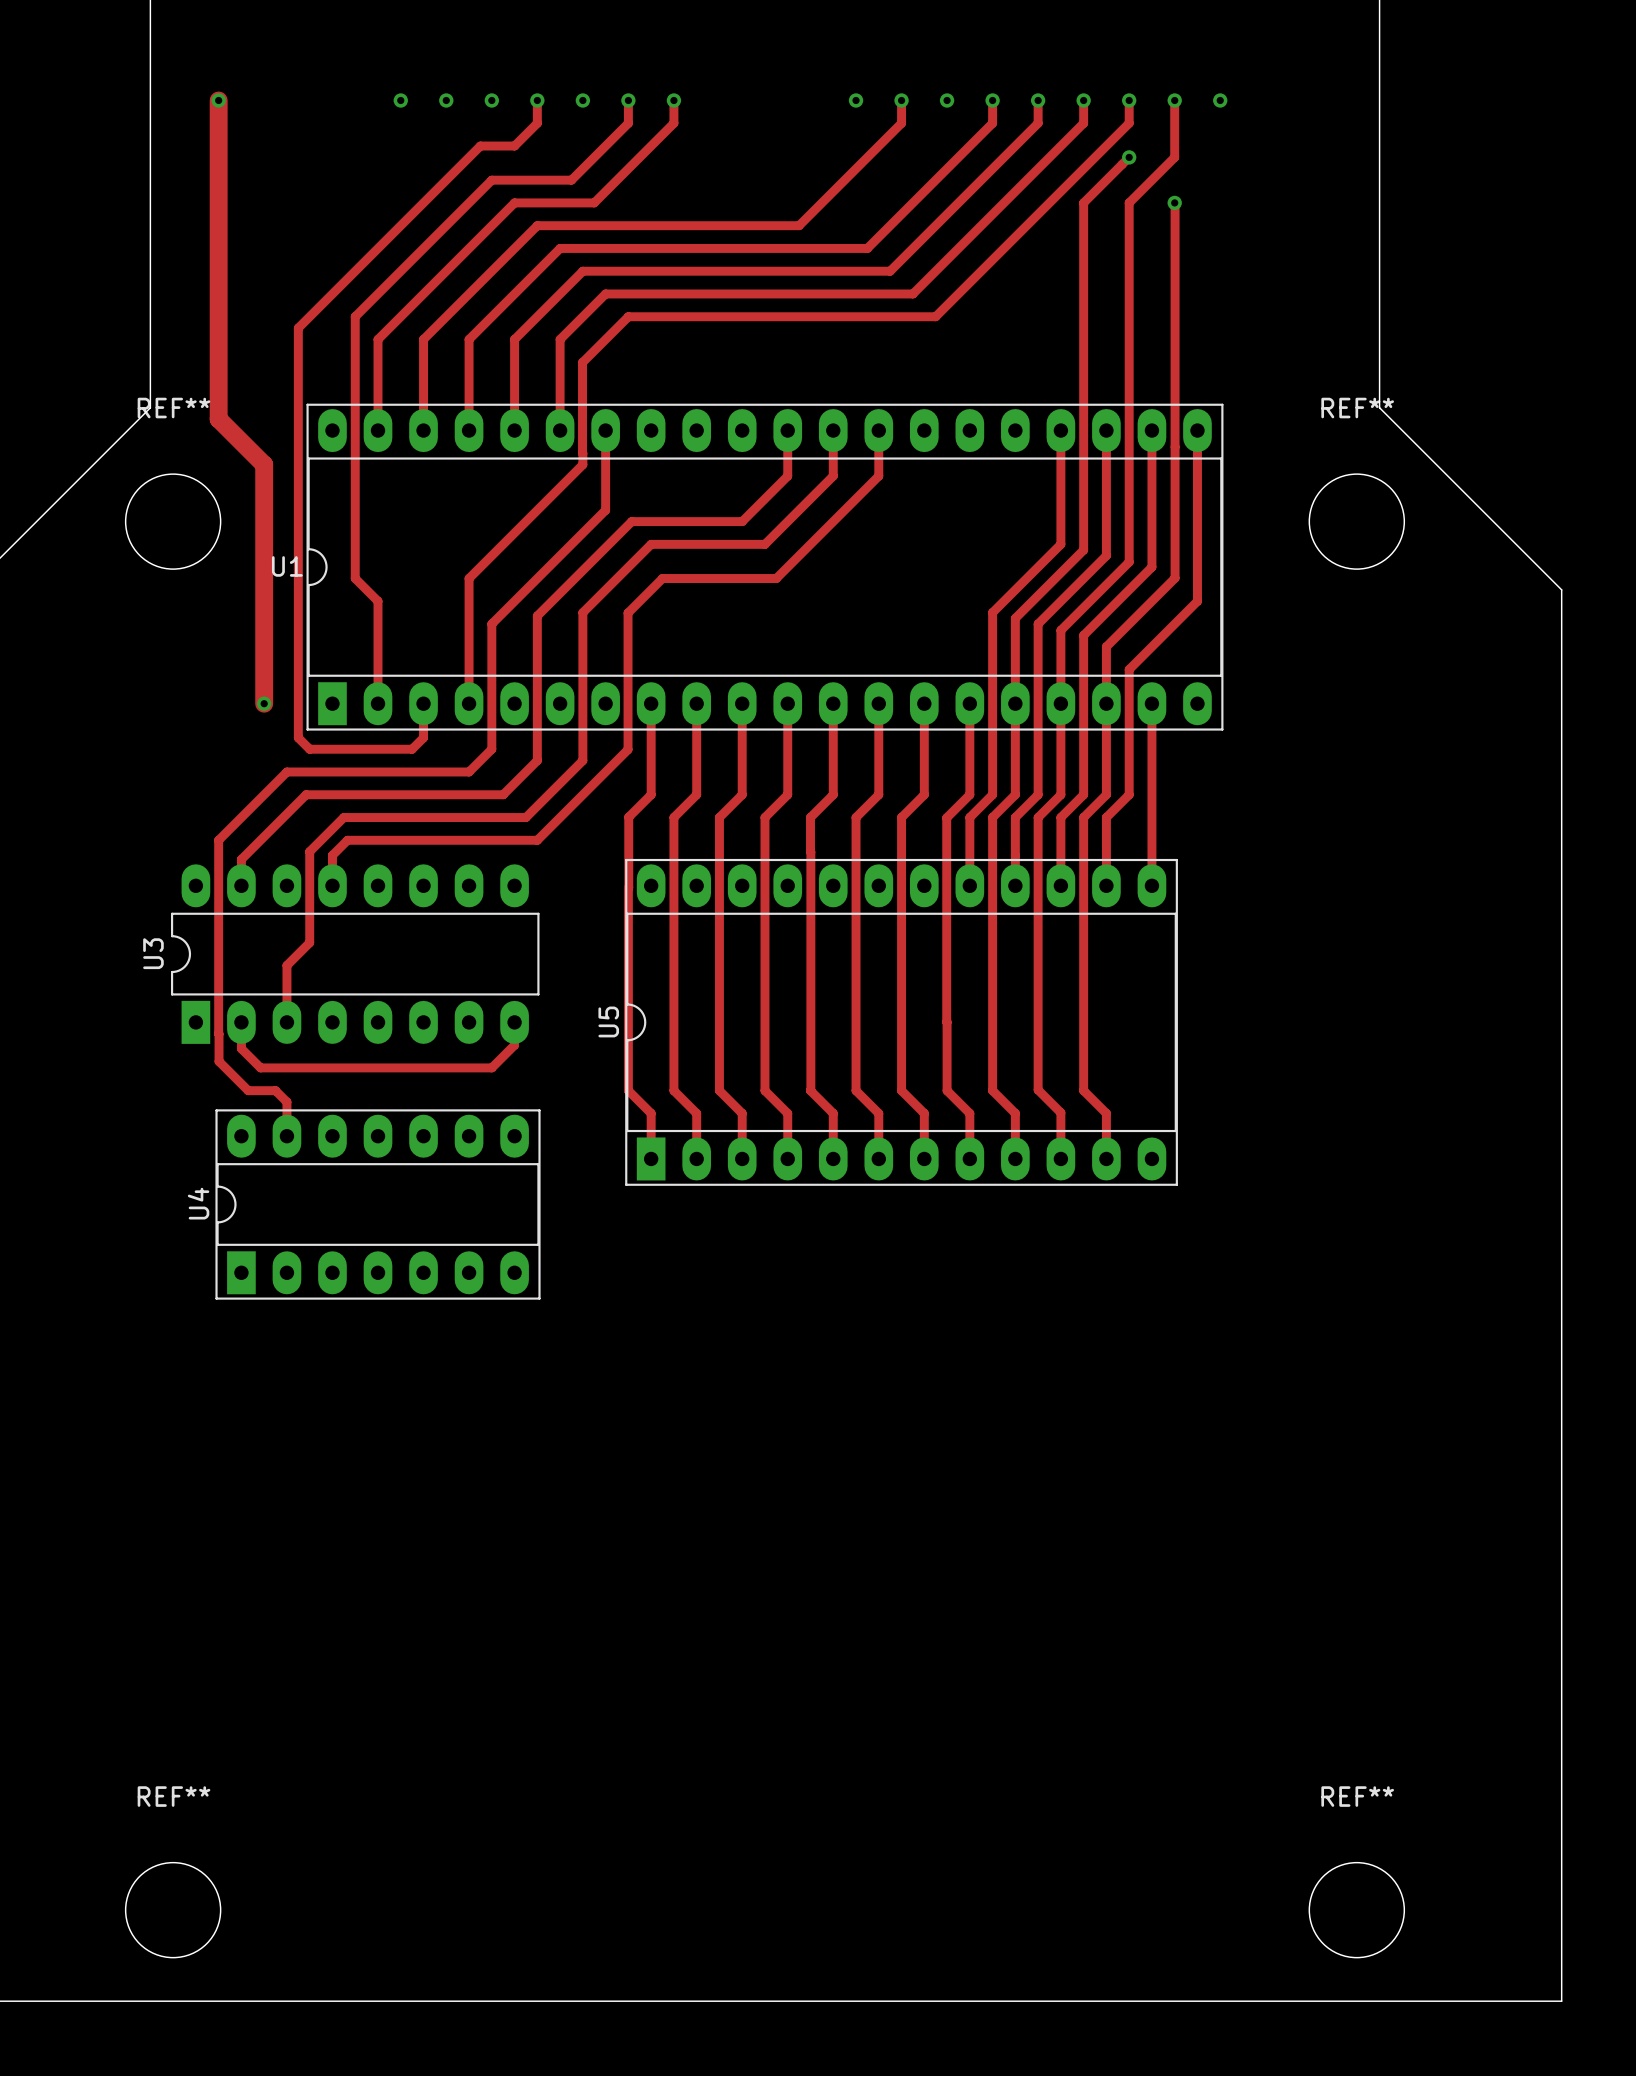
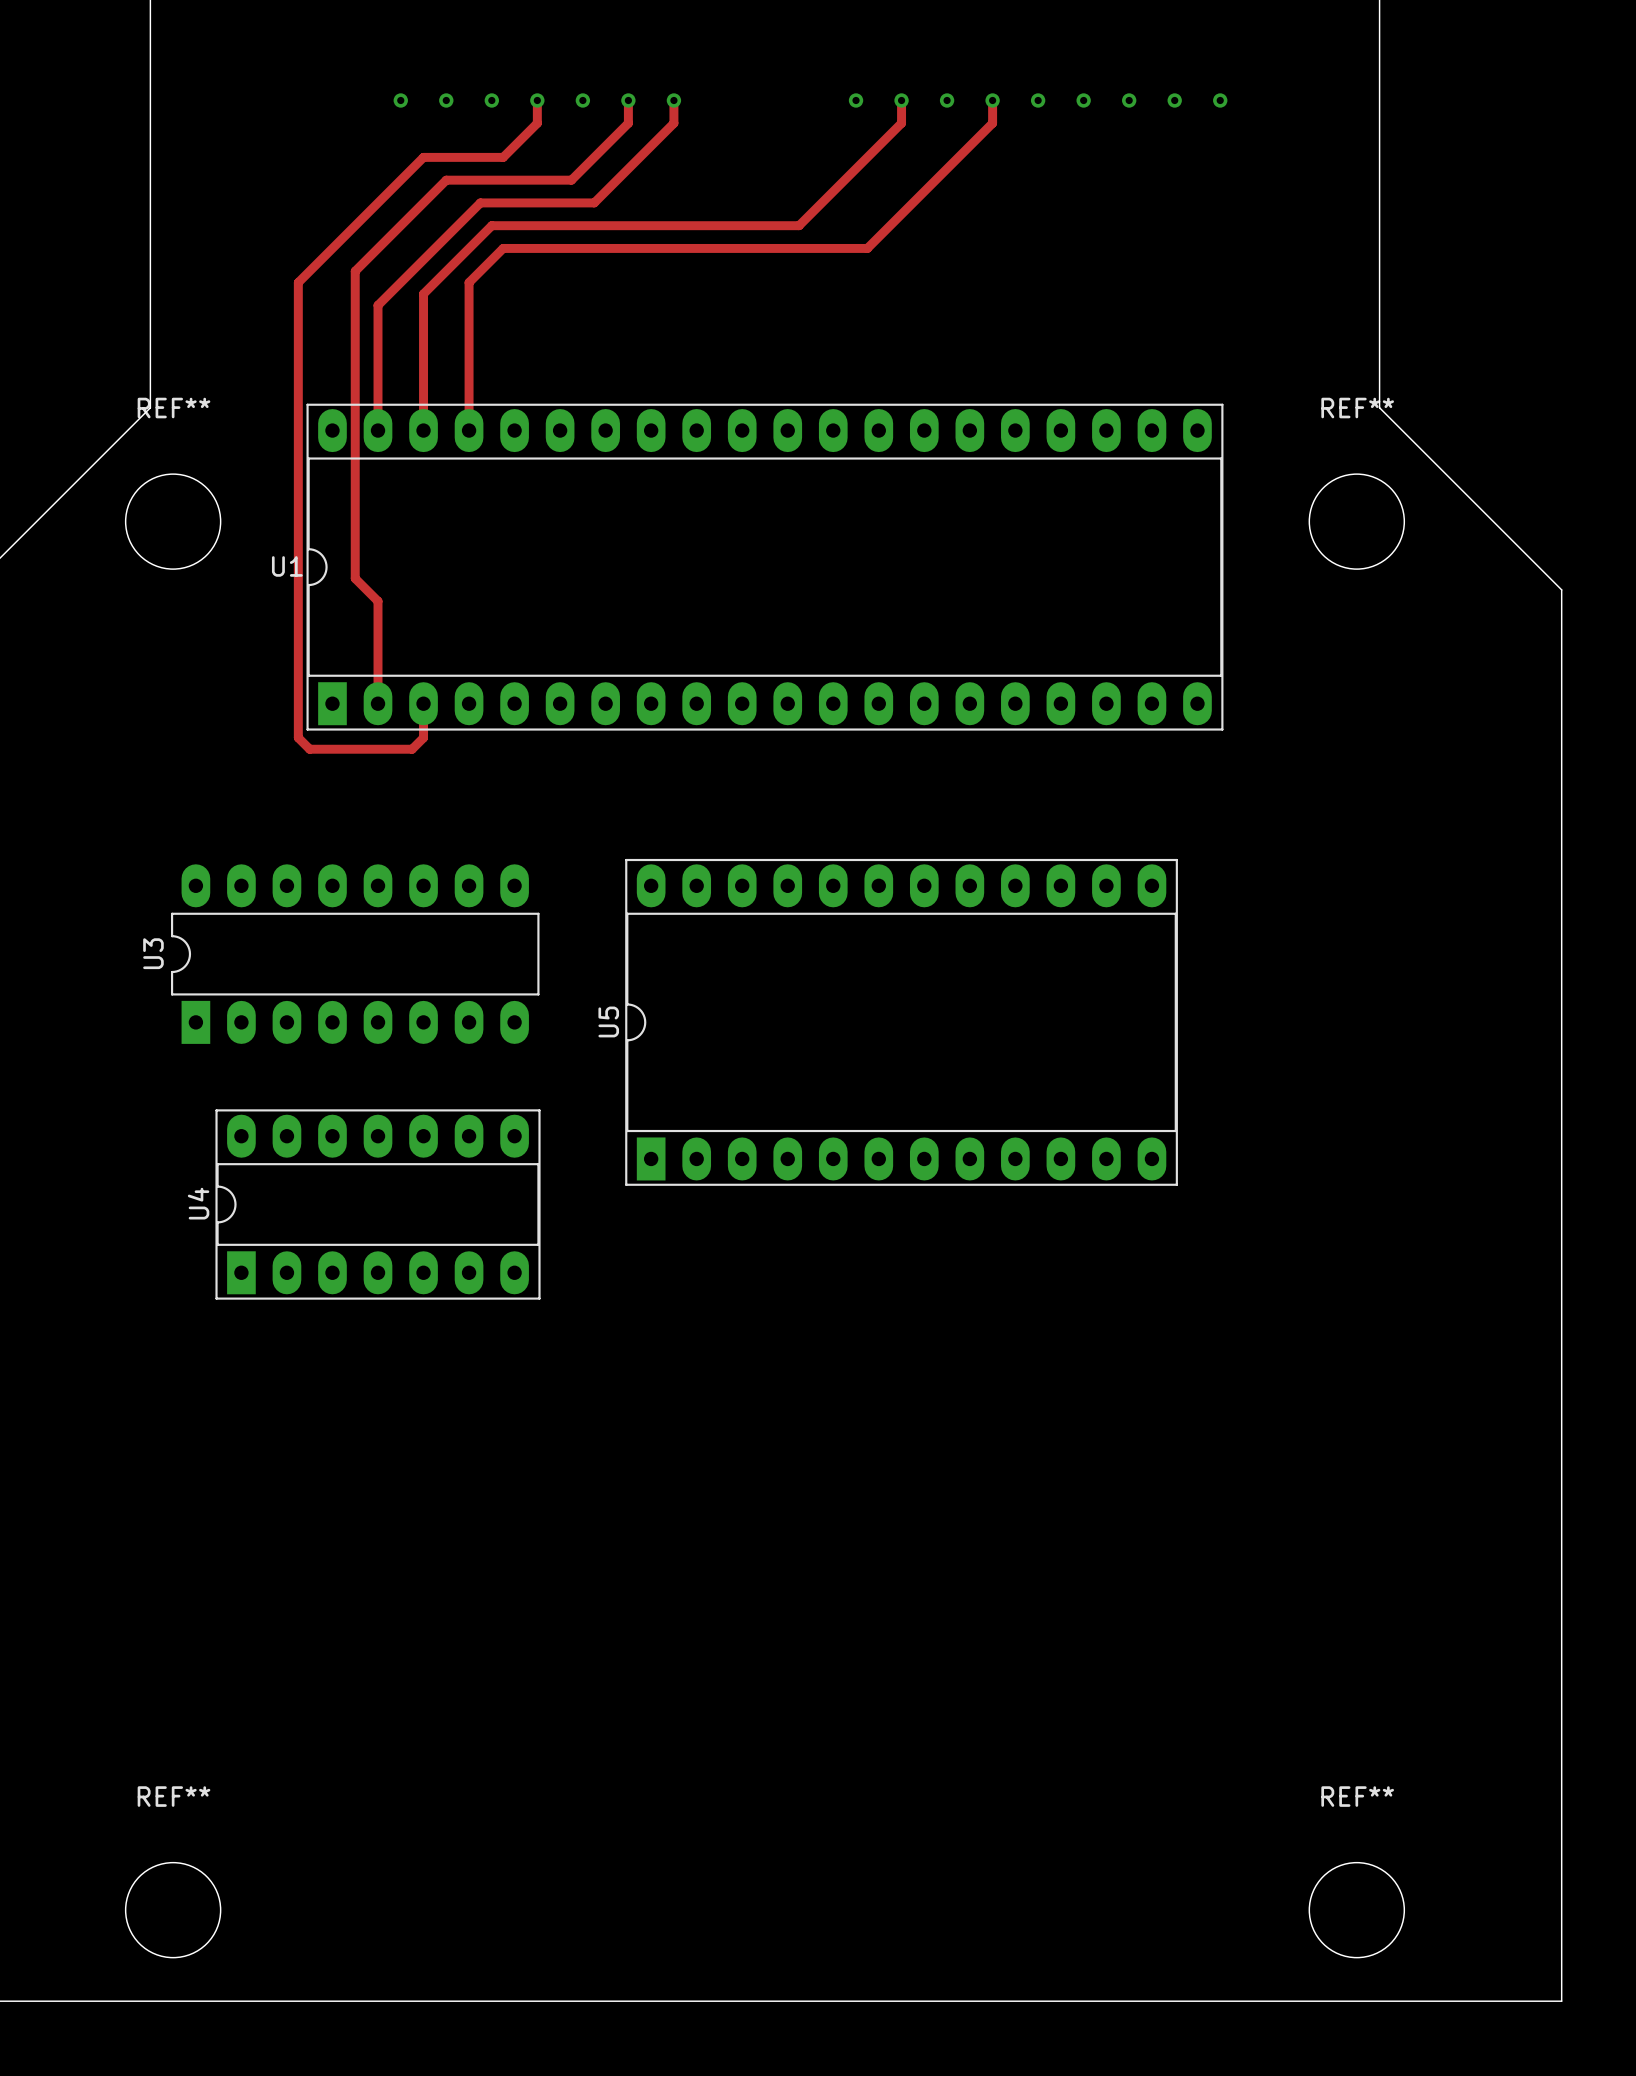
track: (218, 100) (218, 419) (264, 464) (264, 703) -> none
via: (218, 100) -> none
track: (1038, 100) (1038, 123) (890, 271) (582, 271) (514, 339) (514, 430) -> none
track: (1083, 100) (1083, 123) (912, 293) (605, 293) (560, 339) (560, 430) -> none
track: (1129, 100) (1129, 123) (935, 316) (628, 316) (582, 362) (582, 464) (469, 578) (469, 703) -> none
track: (1174, 100) (1174, 157) (1129, 202) (1129, 562) (1060, 630) (1060, 794) (1038, 817) (1038, 1089) (1060, 1112) (1060, 1158) -> none
track: (514, 146) (480, 146) (446, 180) -> (491, 180) (446, 180)
track: none -> (514, 146) (503, 157) (423, 157) (298, 282) (298, 328)
track: (1129, 157) (1083, 202) (1083, 550) (1015, 618) (1015, 794) (992, 817) (992, 1090) (1015, 1113) (1015, 1158) -> none
via: (1129, 157) -> none
track: (491, 180) (355, 316) -> none
track: (514, 202) (491, 225) -> (537, 225) (491, 225)
track: none -> (514, 202) (480, 202) (378, 305) (378, 339)
track: (1174, 202) (1175, 578) (1106, 646) (1106, 794) (1083, 817) (1083, 1090) (1106, 1113) (1106, 1158) -> none
via: (1174, 202) -> none
track: (537, 225) (423, 339) -> none
track: (560, 248) (469, 339) -> (560, 248) (503, 248) (469, 282) (469, 339)
track: (355, 271) (298, 328) -> (355, 271) (355, 316)
track: (423, 293) (378, 339) -> (423, 293) (423, 339)
track: (605, 430) (605, 510) (491, 624) (491, 749) (469, 772) (286, 772) (218, 840) (219, 1061) (248, 1090) (275, 1090) (286, 1102) (286, 1136) -> none
track: (787, 430) (787, 476) (742, 521) (631, 521) (537, 615) (537, 760) (503, 794) (306, 794) (241, 859) (241, 885) -> none
track: (833, 430) (833, 476) (764, 544) (651, 544) (582, 612) (582, 760) (525, 817) (343, 817) (309, 851) (309, 942) (286, 965) (286, 1022) -> none
track: (878, 430) (878, 476) (776, 578) (662, 578) (628, 613) (628, 749) (537, 840) (347, 840) (332, 855) (332, 885) -> none
track: (1060, 430) (1060, 544) (992, 612) (992, 794) (969, 817) (969, 885) -> none
track: (1106, 430) (1106, 555) (1038, 624) (1038, 794) (1015, 817) (1015, 885) -> none
track: (1151, 430) (1151, 567) (1083, 635) (1083, 794) (1060, 817) (1060, 885) -> none
track: (1197, 430) (1197, 601) (1129, 669) (1129, 794) (1106, 817) (1106, 885) -> none
via: (264, 703) -> none
track: (651, 703) (651, 794) (628, 817) (628, 888) (628, 1090) (651, 1113) (651, 1158) -> none
track: (696, 703) (696, 794) (673, 817) (673, 1090) (696, 1113) (696, 1158) -> none
track: (742, 703) (742, 794) (719, 817) (719, 1090) (742, 1113) (742, 1158) -> none
track: (787, 703) (787, 794) (764, 817) (764, 1090) (787, 1113) (787, 1158) -> none
track: (833, 703) (833, 794) (810, 817) (810, 1090) (833, 1113) (833, 1158) -> none
track: (878, 703) (878, 794) (856, 817) (856, 1090) (878, 1113) (878, 1158) -> none
track: (924, 703) (924, 794) (901, 817) (901, 1090) (924, 1113) (924, 1158) -> none
track: (969, 703) (969, 794) (946, 817) (947, 1090) (969, 1113) (969, 1158) -> none
track: (1151, 703) (1151, 885) -> none
track: (241, 1022) (241, 1048) (260, 1067) (491, 1067) (514, 1045) (514, 1022) -> none

